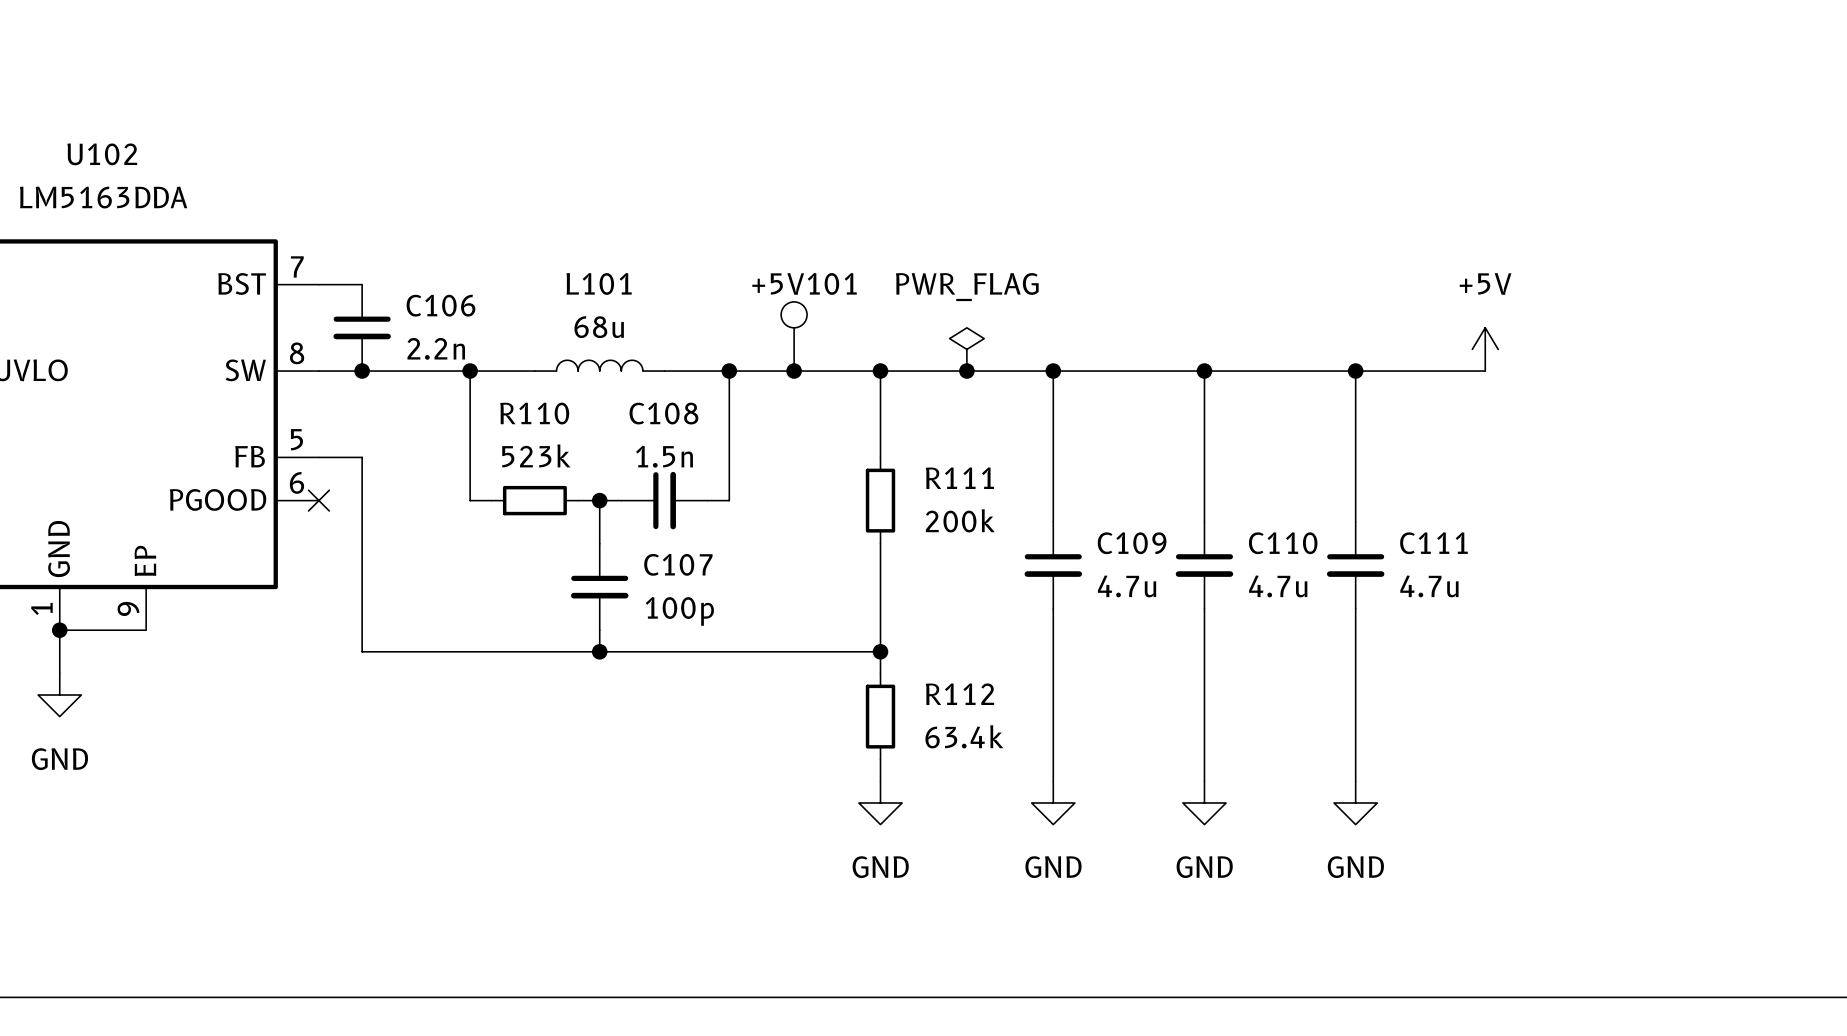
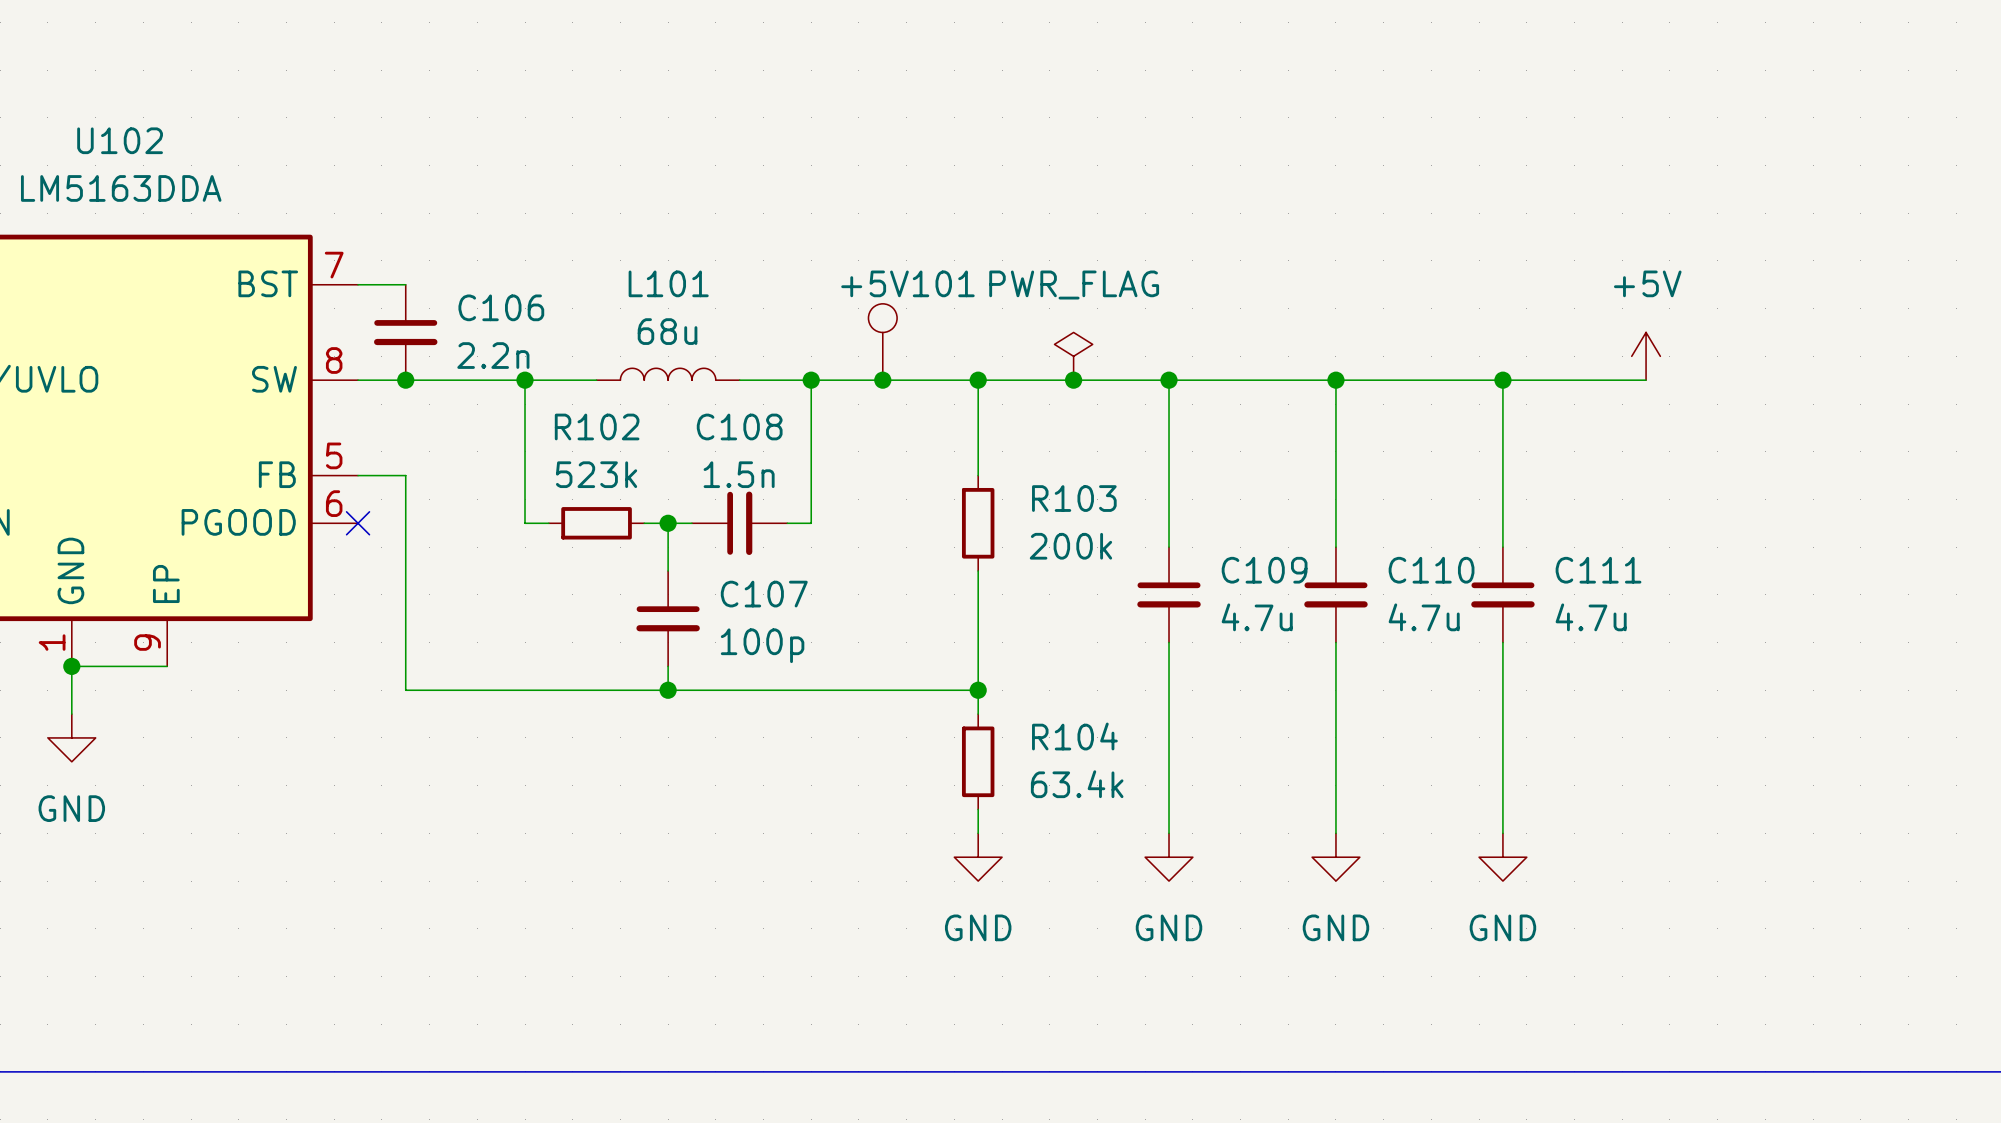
R110 name: R110 (534, 413) -> R102 (597, 426)
R111 name: R111 (959, 478) -> R103 (1074, 498)
R112 name: R112 (960, 694) -> R104 (1074, 736)

